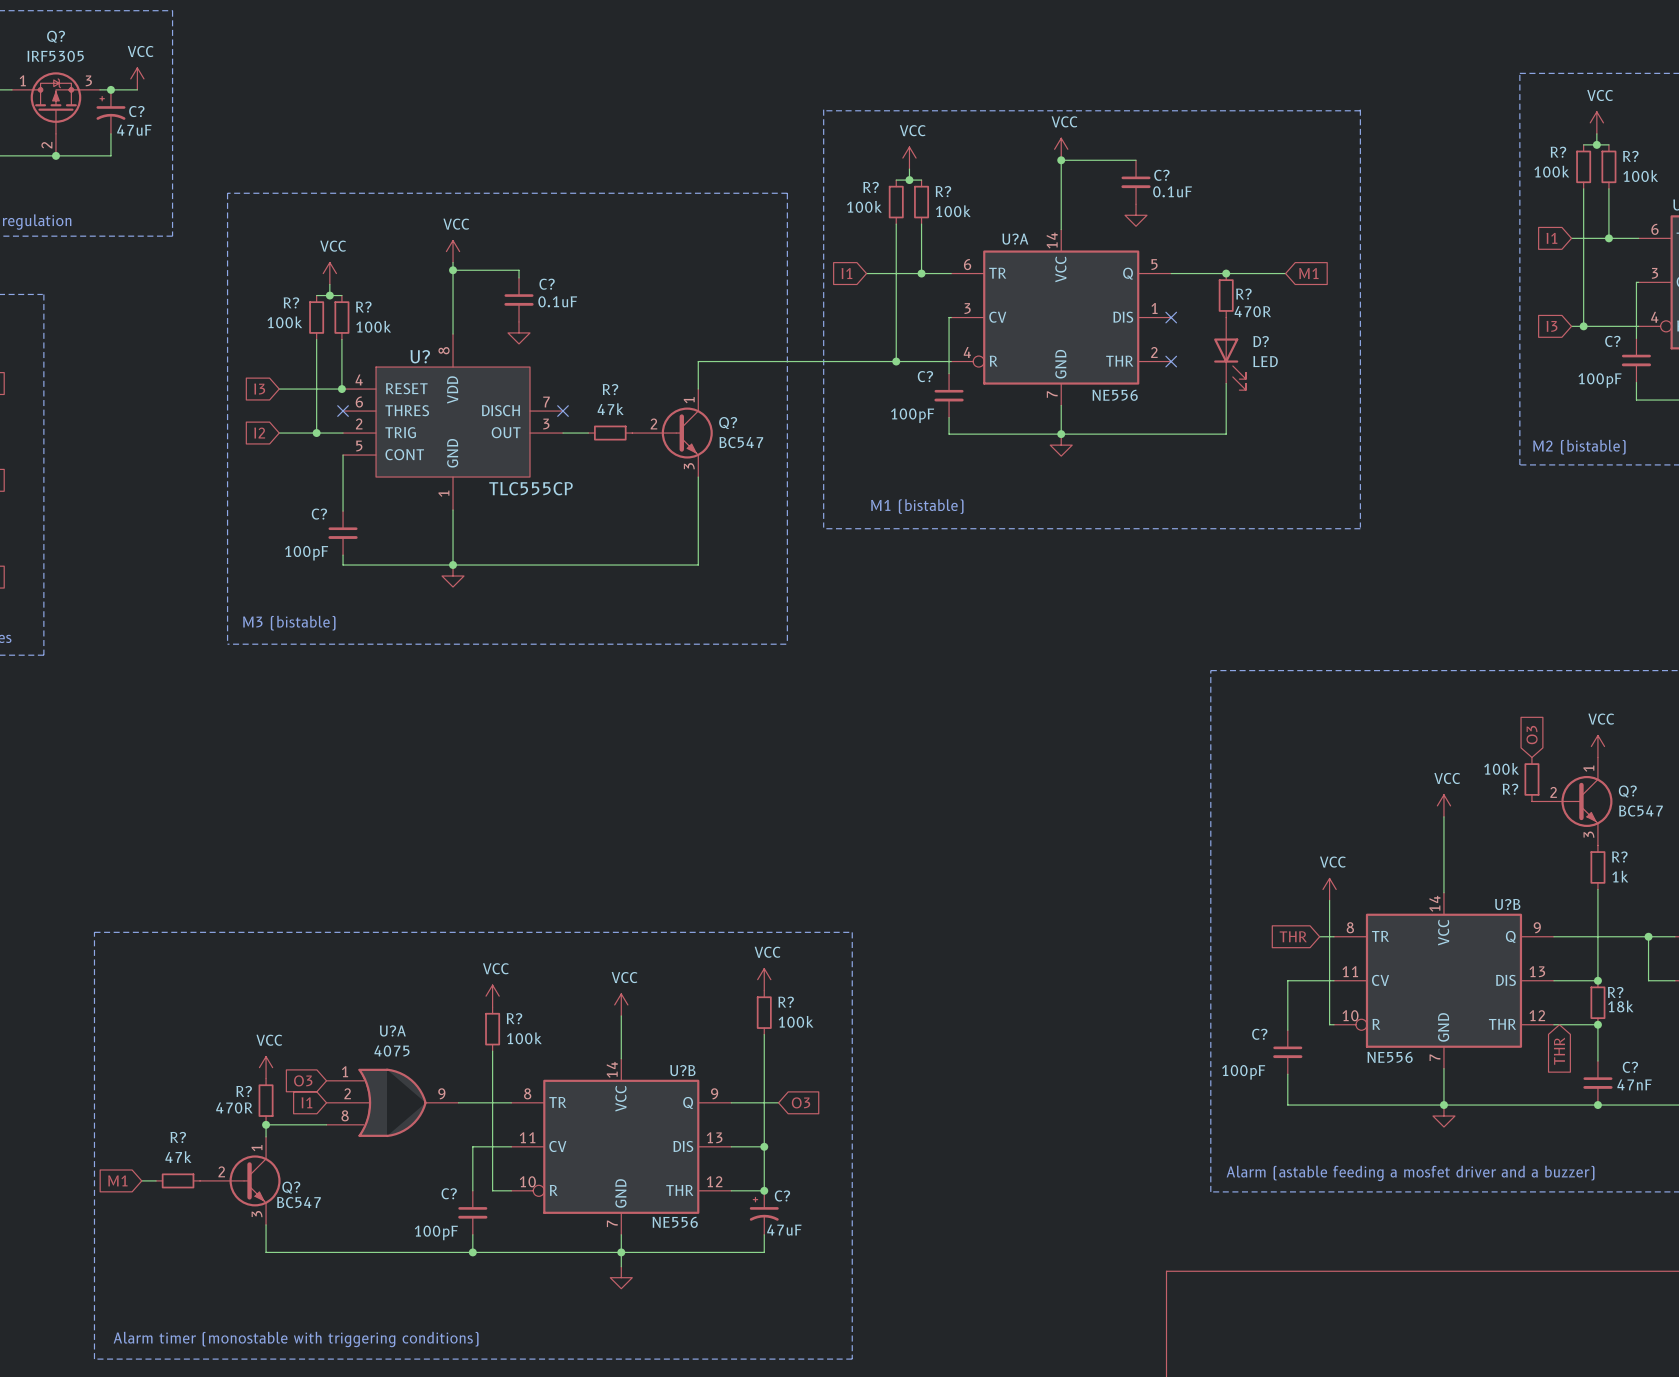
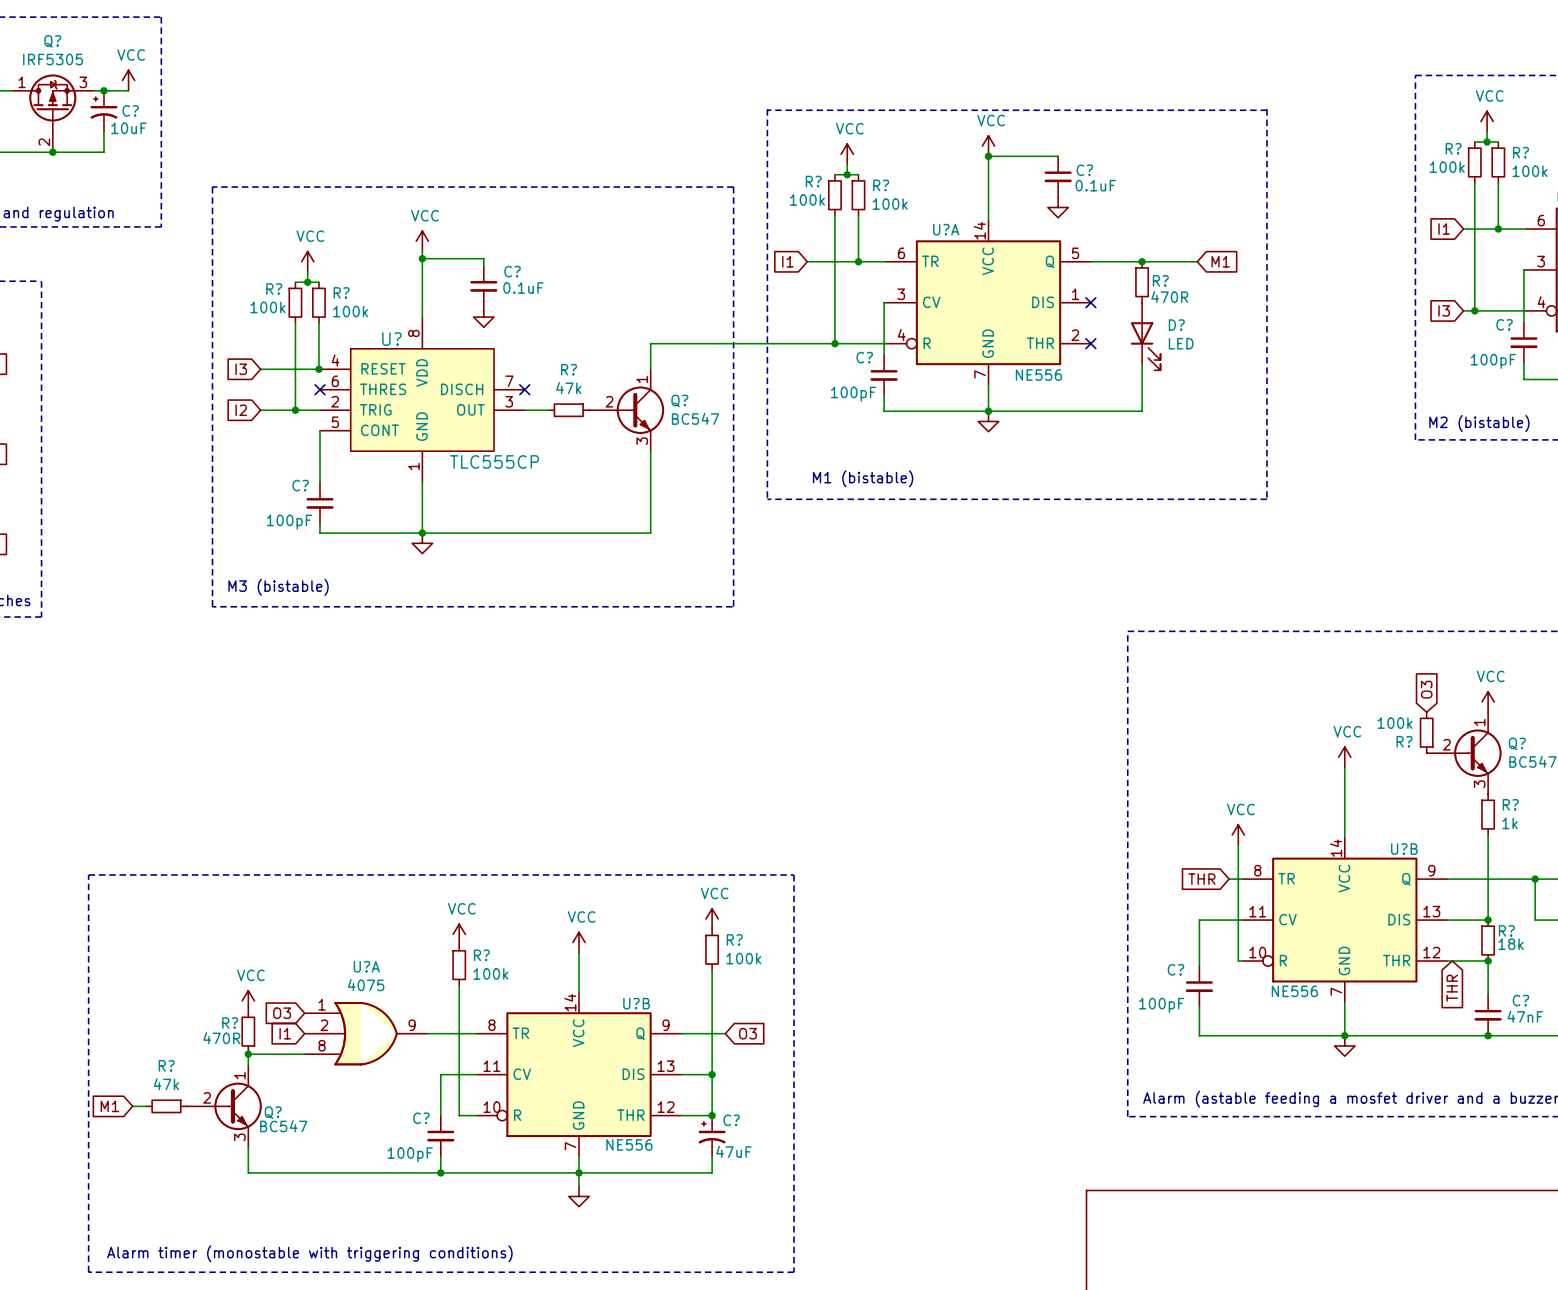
C? value: 47uF (134, 130) -> 10uF (128, 128)

